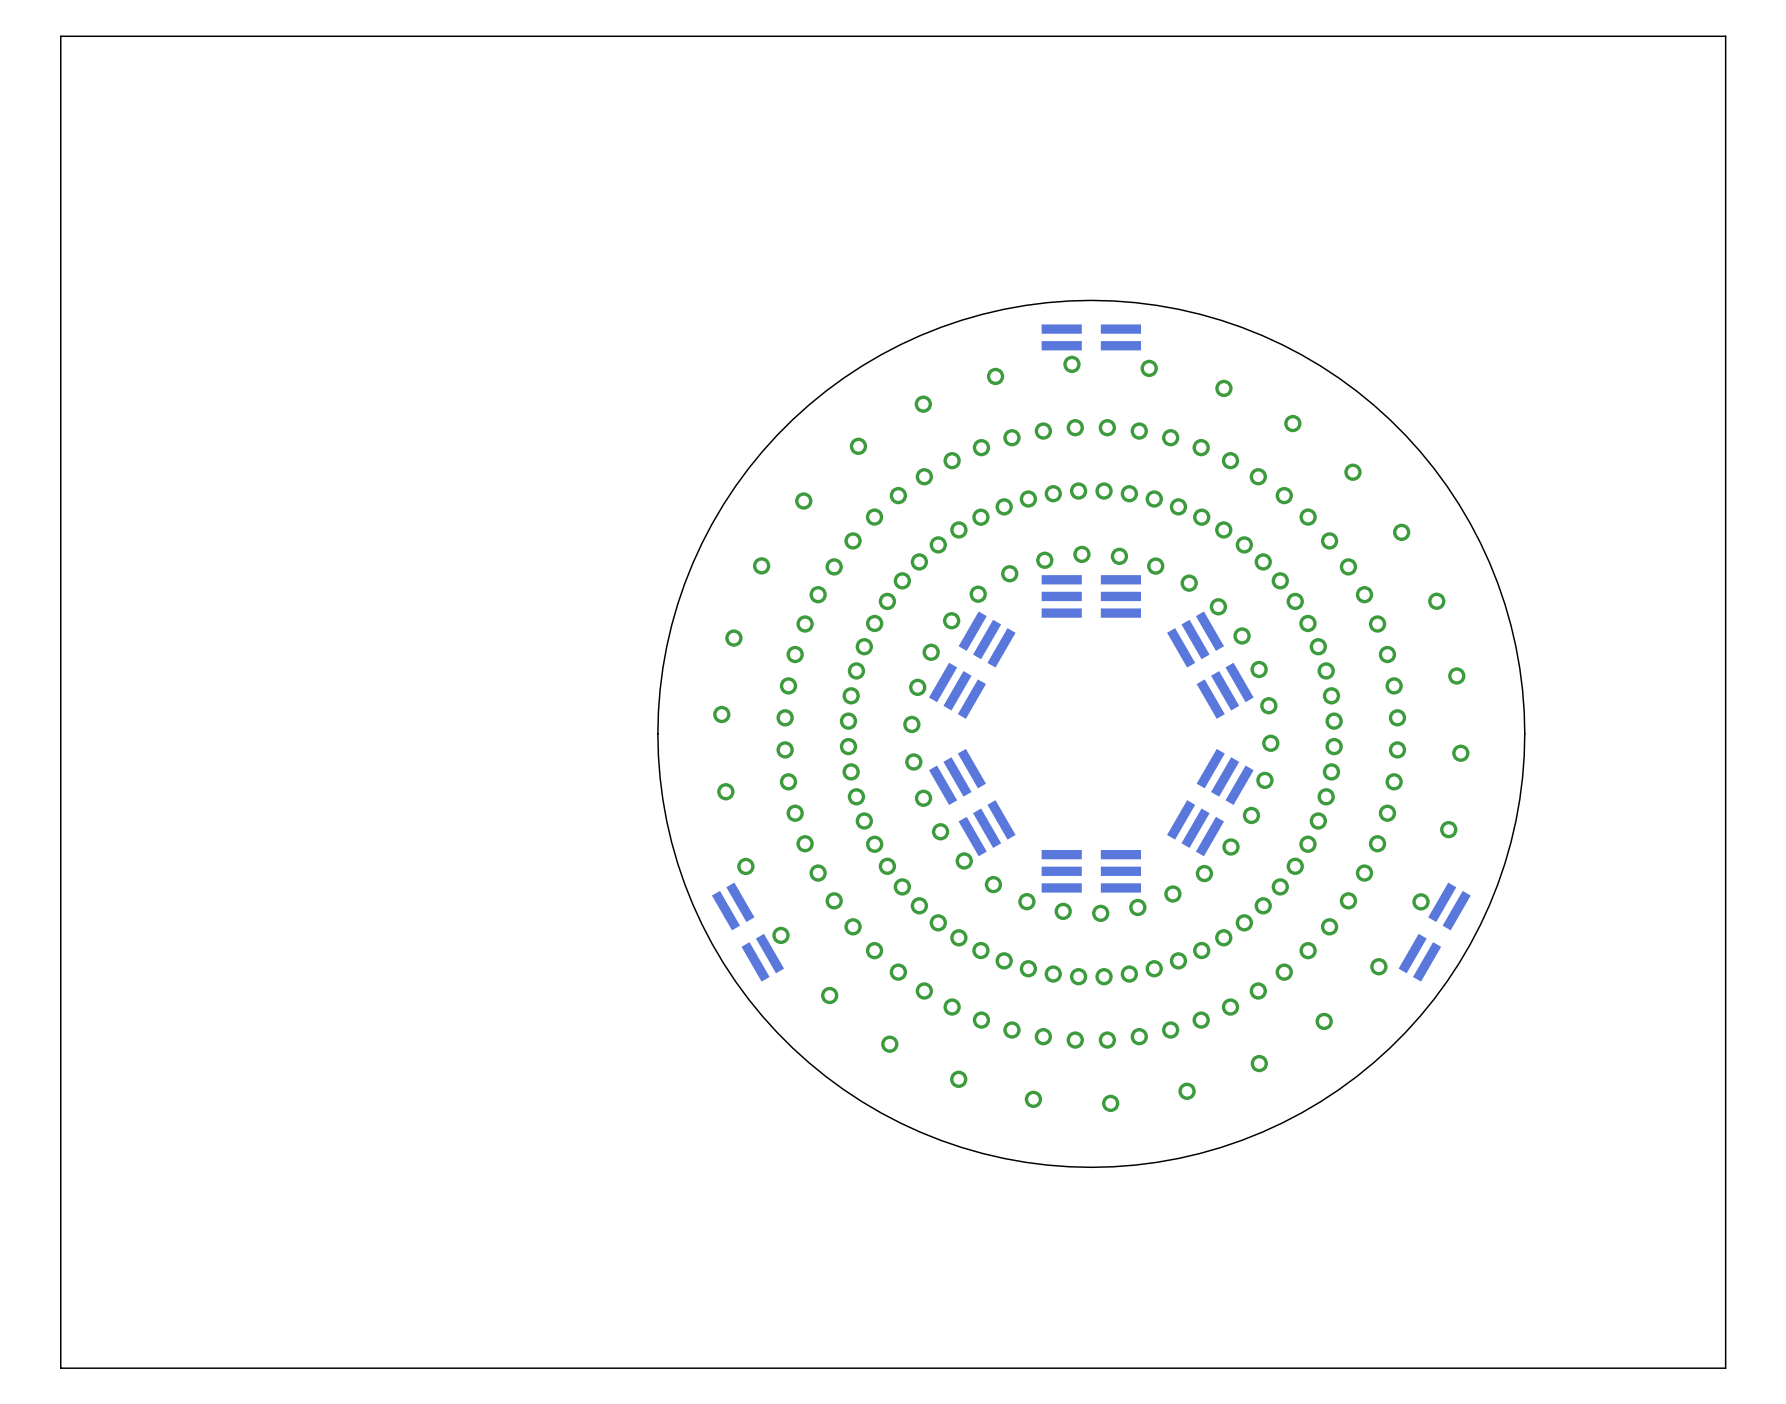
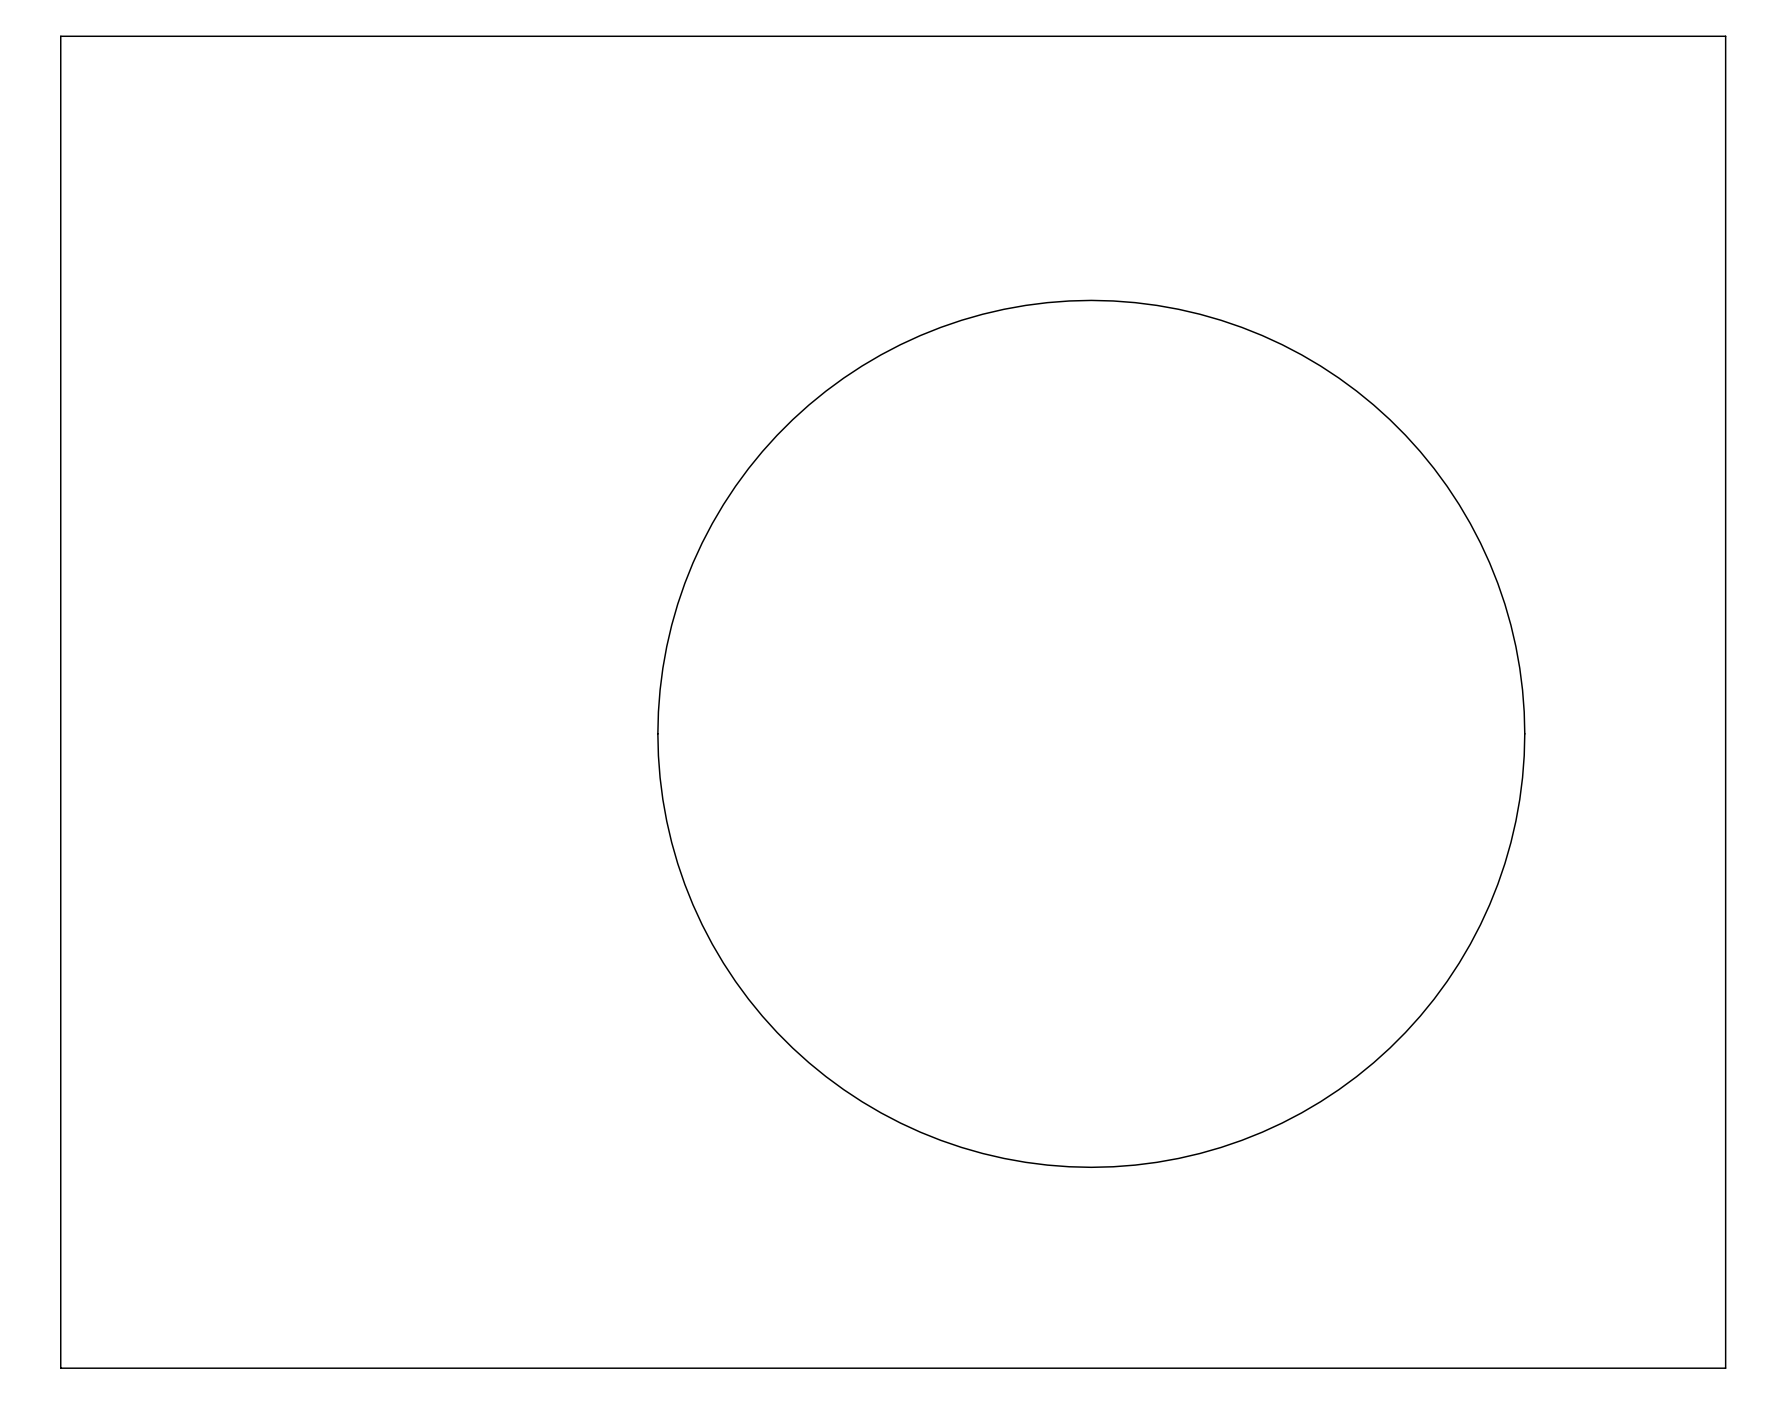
part: (1091, 337) -> none
via: (1071, 364) -> none
via: (1149, 368) -> none
via: (995, 376) -> none
via: (1223, 388) -> none
via: (923, 404) -> none
via: (1292, 423) -> none
via: (1075, 427) -> none
via: (1107, 427) -> none
via: (1043, 431) -> none
via: (1139, 431) -> none
via: (1011, 437) -> none
via: (1170, 437) -> none
via: (858, 446) -> none
via: (981, 447) -> none
via: (1201, 447) -> none
via: (952, 460) -> none
via: (1230, 460) -> none
via: (1352, 472) -> none
via: (924, 476) -> none
via: (1258, 476) -> none
via: (1078, 491) -> none
via: (1104, 491) -> none
via: (1053, 493) -> none
via: (1129, 493) -> none
via: (898, 495) -> none
via: (1284, 495) -> none
via: (1028, 499) -> none
via: (1154, 499) -> none
via: (803, 501) -> none
via: (1004, 506) -> none
via: (1178, 506) -> none
via: (874, 517) -> none
via: (980, 517) -> none
via: (1201, 517) -> none
via: (1308, 517) -> none
via: (958, 529) -> none
via: (1223, 529) -> none
via: (1401, 532) -> none
via: (853, 540) -> none
via: (1329, 540) -> none
via: (938, 544) -> none
via: (1244, 544) -> none
via: (1081, 554) -> none
via: (1119, 556) -> none
via: (1044, 560) -> none
via: (919, 561) -> none
via: (1263, 561) -> none
via: (761, 565) -> none
via: (834, 566) -> none
via: (1155, 566) -> none
via: (1348, 566) -> none
via: (1009, 573) -> none
via: (902, 580) -> none
via: (1280, 580) -> none
via: (1189, 583) -> none
via: (818, 594) -> none
via: (978, 594) -> none
via: (1364, 594) -> none
part: (1091, 596) -> none
via: (887, 601) -> none
via: (1295, 601) -> none
via: (1436, 601) -> none
via: (1218, 606) -> none
via: (951, 620) -> none
via: (874, 623) -> none
via: (1307, 623) -> none
via: (805, 624) -> none
via: (1377, 624) -> none
via: (1242, 635) -> none
via: (733, 638) -> none
via: (864, 646) -> none
via: (1318, 646) -> none
via: (931, 652) -> none
via: (795, 654) -> none
via: (1387, 654) -> none
part: (972, 665) -> none
part: (1210, 665) -> none
via: (1259, 669) -> none
via: (856, 670) -> none
via: (1326, 670) -> none
via: (1456, 675) -> none
via: (788, 685) -> none
via: (1394, 685) -> none
via: (917, 687) -> none
via: (851, 695) -> none
via: (1331, 695) -> none
via: (1268, 705) -> none
via: (721, 714) -> none
via: (785, 717) -> none
via: (1397, 717) -> none
via: (848, 721) -> none
via: (1334, 721) -> none
via: (911, 724) -> none
via: (1270, 743) -> none
via: (848, 746) -> none
via: (1334, 746) -> none
via: (785, 749) -> none
via: (1397, 749) -> none
via: (1460, 753) -> none
via: (913, 761) -> none
via: (851, 771) -> none
via: (1331, 771) -> none
via: (1264, 780) -> none
via: (788, 781) -> none
via: (1394, 781) -> none
via: (725, 791) -> none
via: (856, 796) -> none
via: (1326, 796) -> none
via: (923, 798) -> none
part: (972, 802) -> none
part: (1210, 802) -> none
via: (795, 813) -> none
via: (1387, 813) -> none
via: (1251, 815) -> none
via: (864, 821) -> none
via: (1318, 821) -> none
via: (1448, 829) -> none
via: (940, 831) -> none
via: (805, 843) -> none
via: (1377, 843) -> none
via: (874, 844) -> none
via: (1307, 844) -> none
via: (1230, 846) -> none
via: (964, 860) -> none
via: (745, 866) -> none
via: (887, 866) -> none
via: (1295, 866) -> none
part: (1091, 871) -> none
via: (818, 873) -> none
via: (1204, 873) -> none
via: (1364, 873) -> none
via: (993, 884) -> none
via: (902, 886) -> none
via: (1280, 886) -> none
via: (1172, 894) -> none
via: (834, 900) -> none
via: (1348, 900) -> none
via: (1026, 901) -> none
via: (1421, 901) -> none
via: (919, 905) -> none
via: (1263, 905) -> none
via: (1137, 907) -> none
via: (1063, 911) -> none
via: (1100, 913) -> none
via: (938, 922) -> none
via: (1244, 922) -> none
via: (853, 926) -> none
via: (1329, 926) -> none
part: (747, 932) -> none
part: (1434, 932) -> none
via: (780, 935) -> none
via: (958, 937) -> none
via: (1223, 937) -> none
via: (874, 950) -> none
via: (980, 950) -> none
via: (1201, 950) -> none
via: (1308, 950) -> none
via: (1004, 960) -> none
via: (1178, 960) -> none
via: (1378, 966) -> none
via: (1028, 968) -> none
via: (1154, 968) -> none
via: (898, 972) -> none
via: (1284, 972) -> none
via: (1053, 974) -> none
via: (1129, 974) -> none
via: (1078, 976) -> none
via: (1104, 976) -> none
via: (924, 991) -> none
via: (1258, 991) -> none
via: (829, 995) -> none
via: (952, 1007) -> none
via: (1230, 1007) -> none
via: (981, 1020) -> none
via: (1201, 1020) -> none
via: (1324, 1021) -> none
via: (1011, 1030) -> none
via: (1170, 1030) -> none
via: (1043, 1036) -> none
via: (1139, 1036) -> none
via: (1075, 1040) -> none
via: (1107, 1040) -> none
via: (889, 1044) -> none
via: (1259, 1063) -> none
via: (958, 1079) -> none
via: (1187, 1091) -> none
via: (1033, 1099) -> none
via: (1110, 1103) -> none

